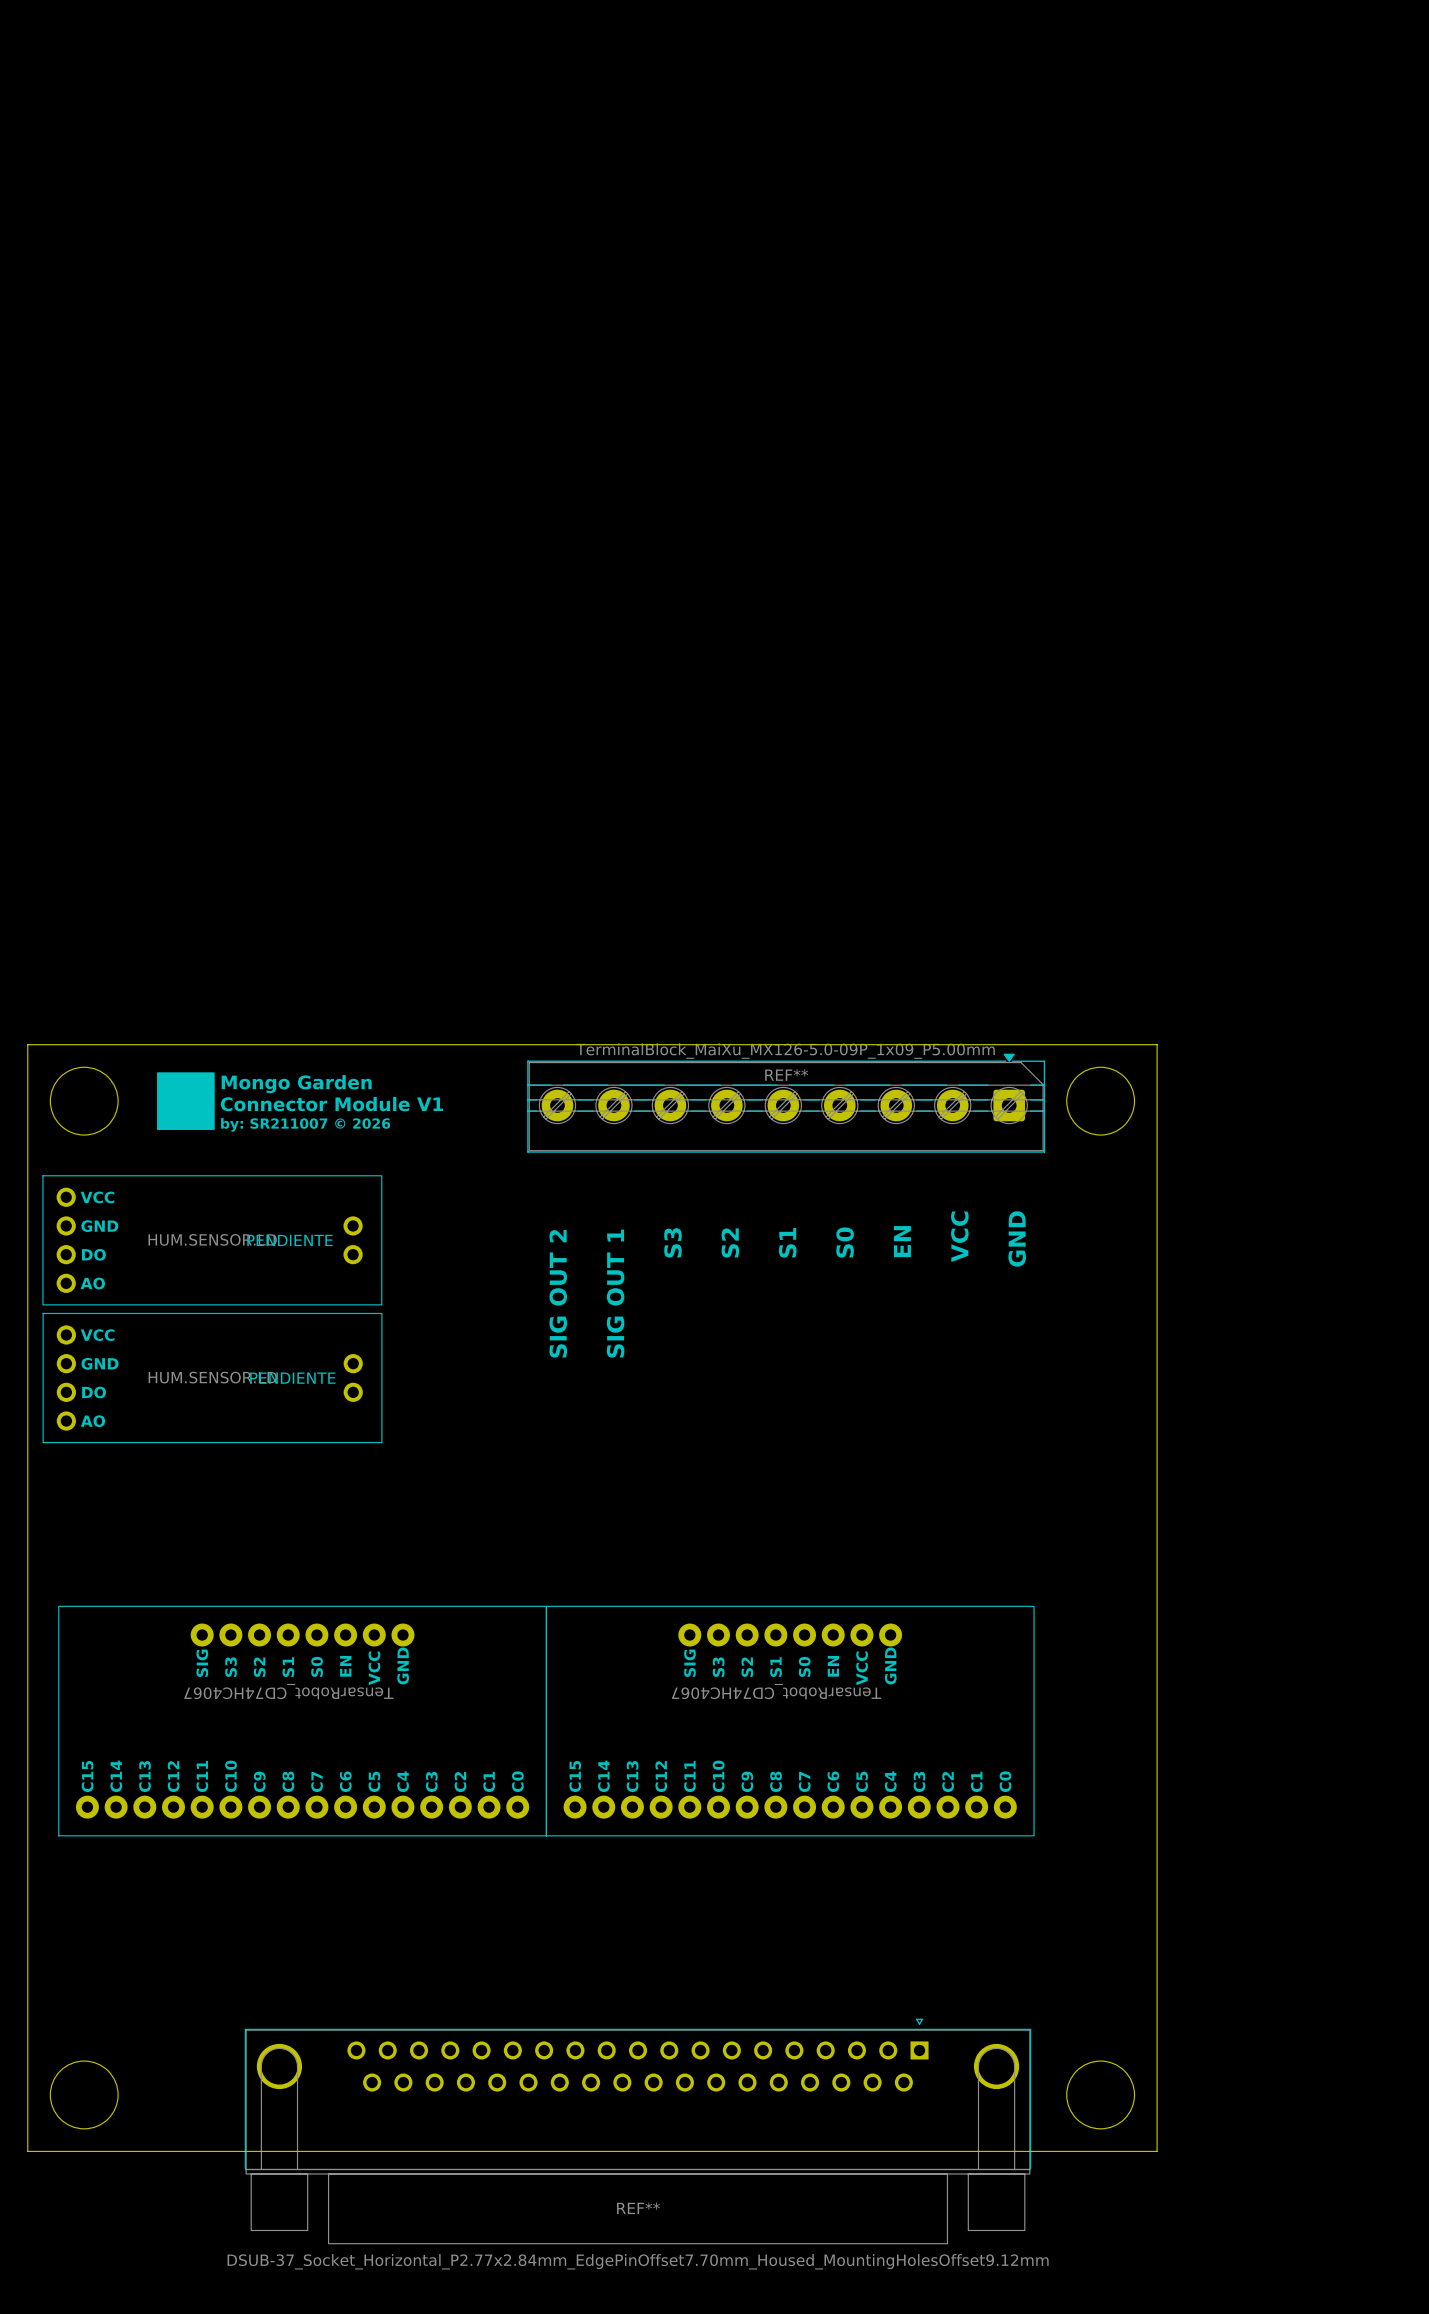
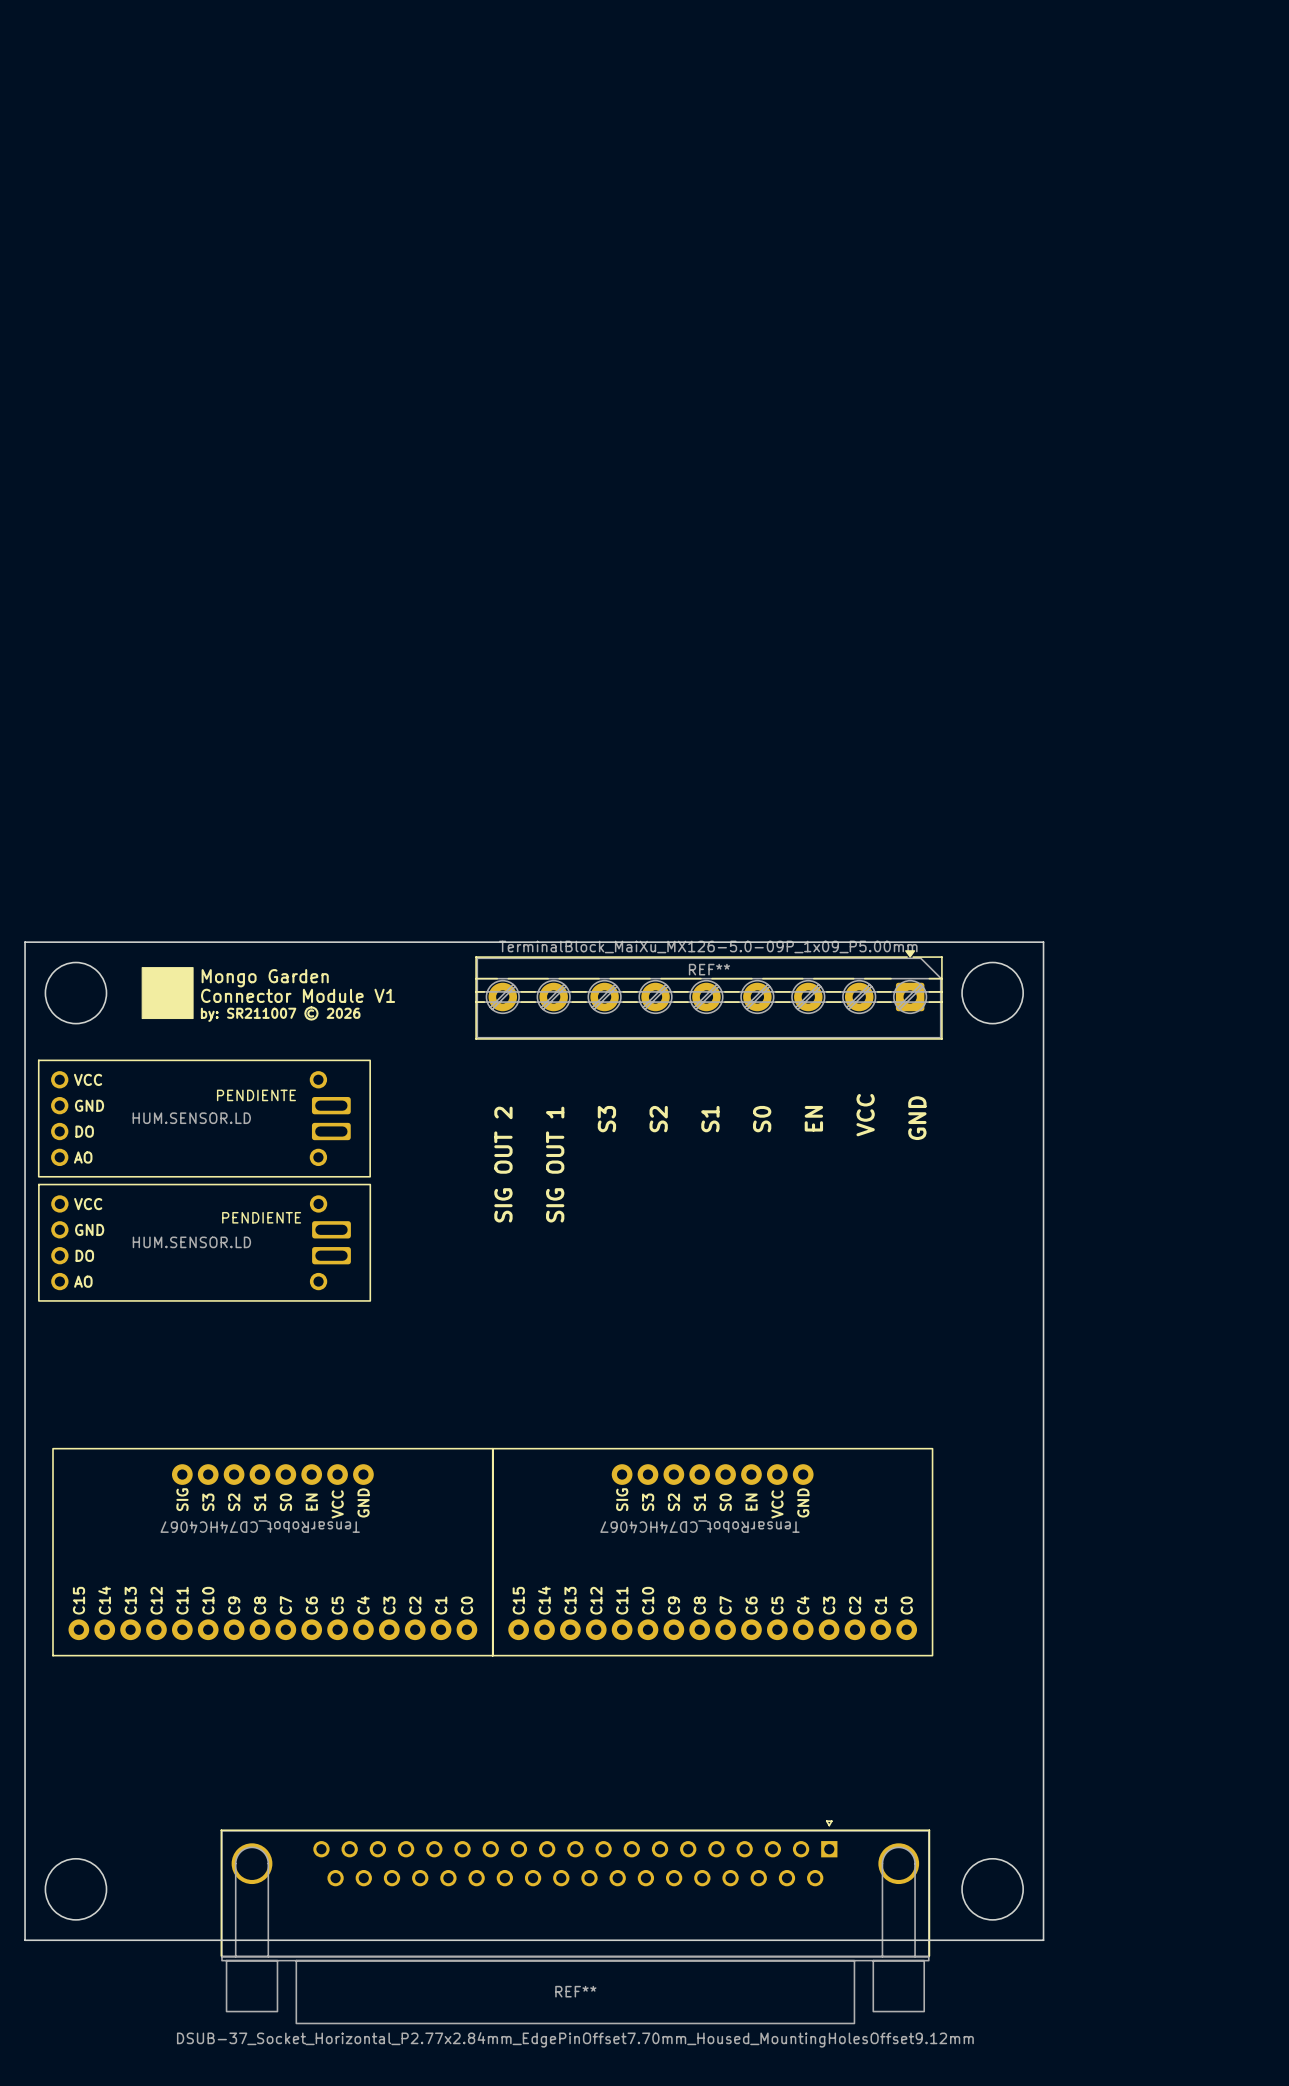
part: HUM.SENSOR.LD (212, 1240) -> none
part: none -> HUM.SENSOR.LD (204, 1118)
part: HUM.SENSOR.LD (212, 1378) -> none
part: none -> HUM.SENSOR.LD (204, 1242)

